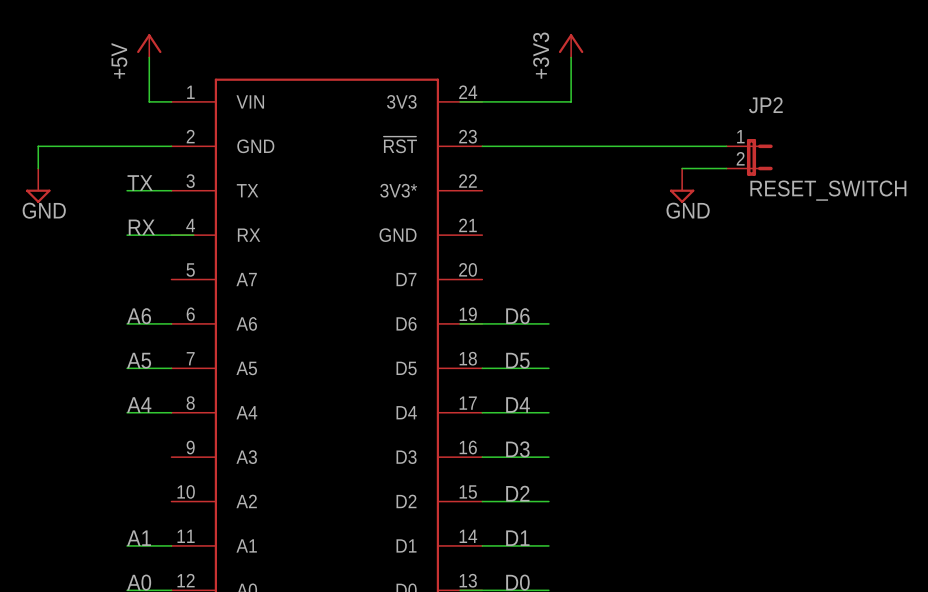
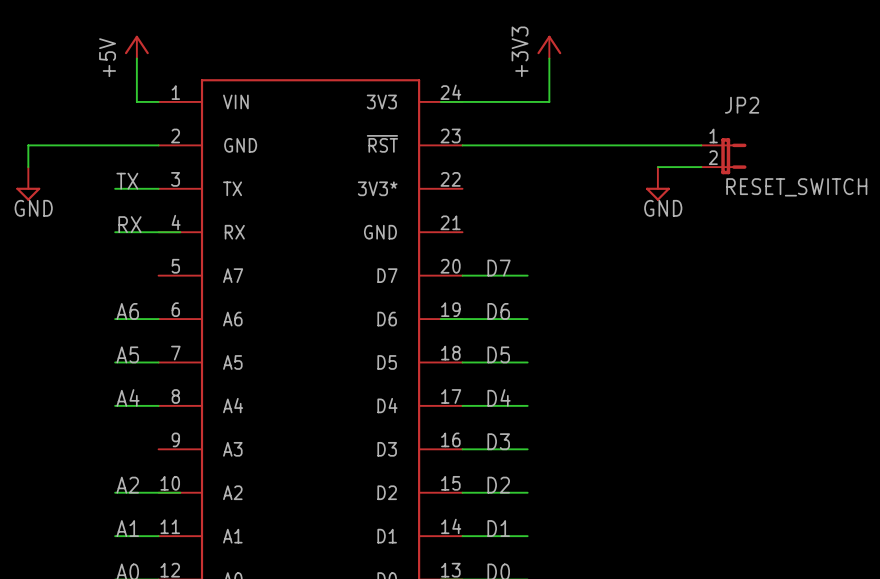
label: none -> D7 (499, 268)
wire: none -> (462, 275) (527, 275)
label: none -> A2 (127, 485)
wire: none -> (115, 492) (180, 492)

